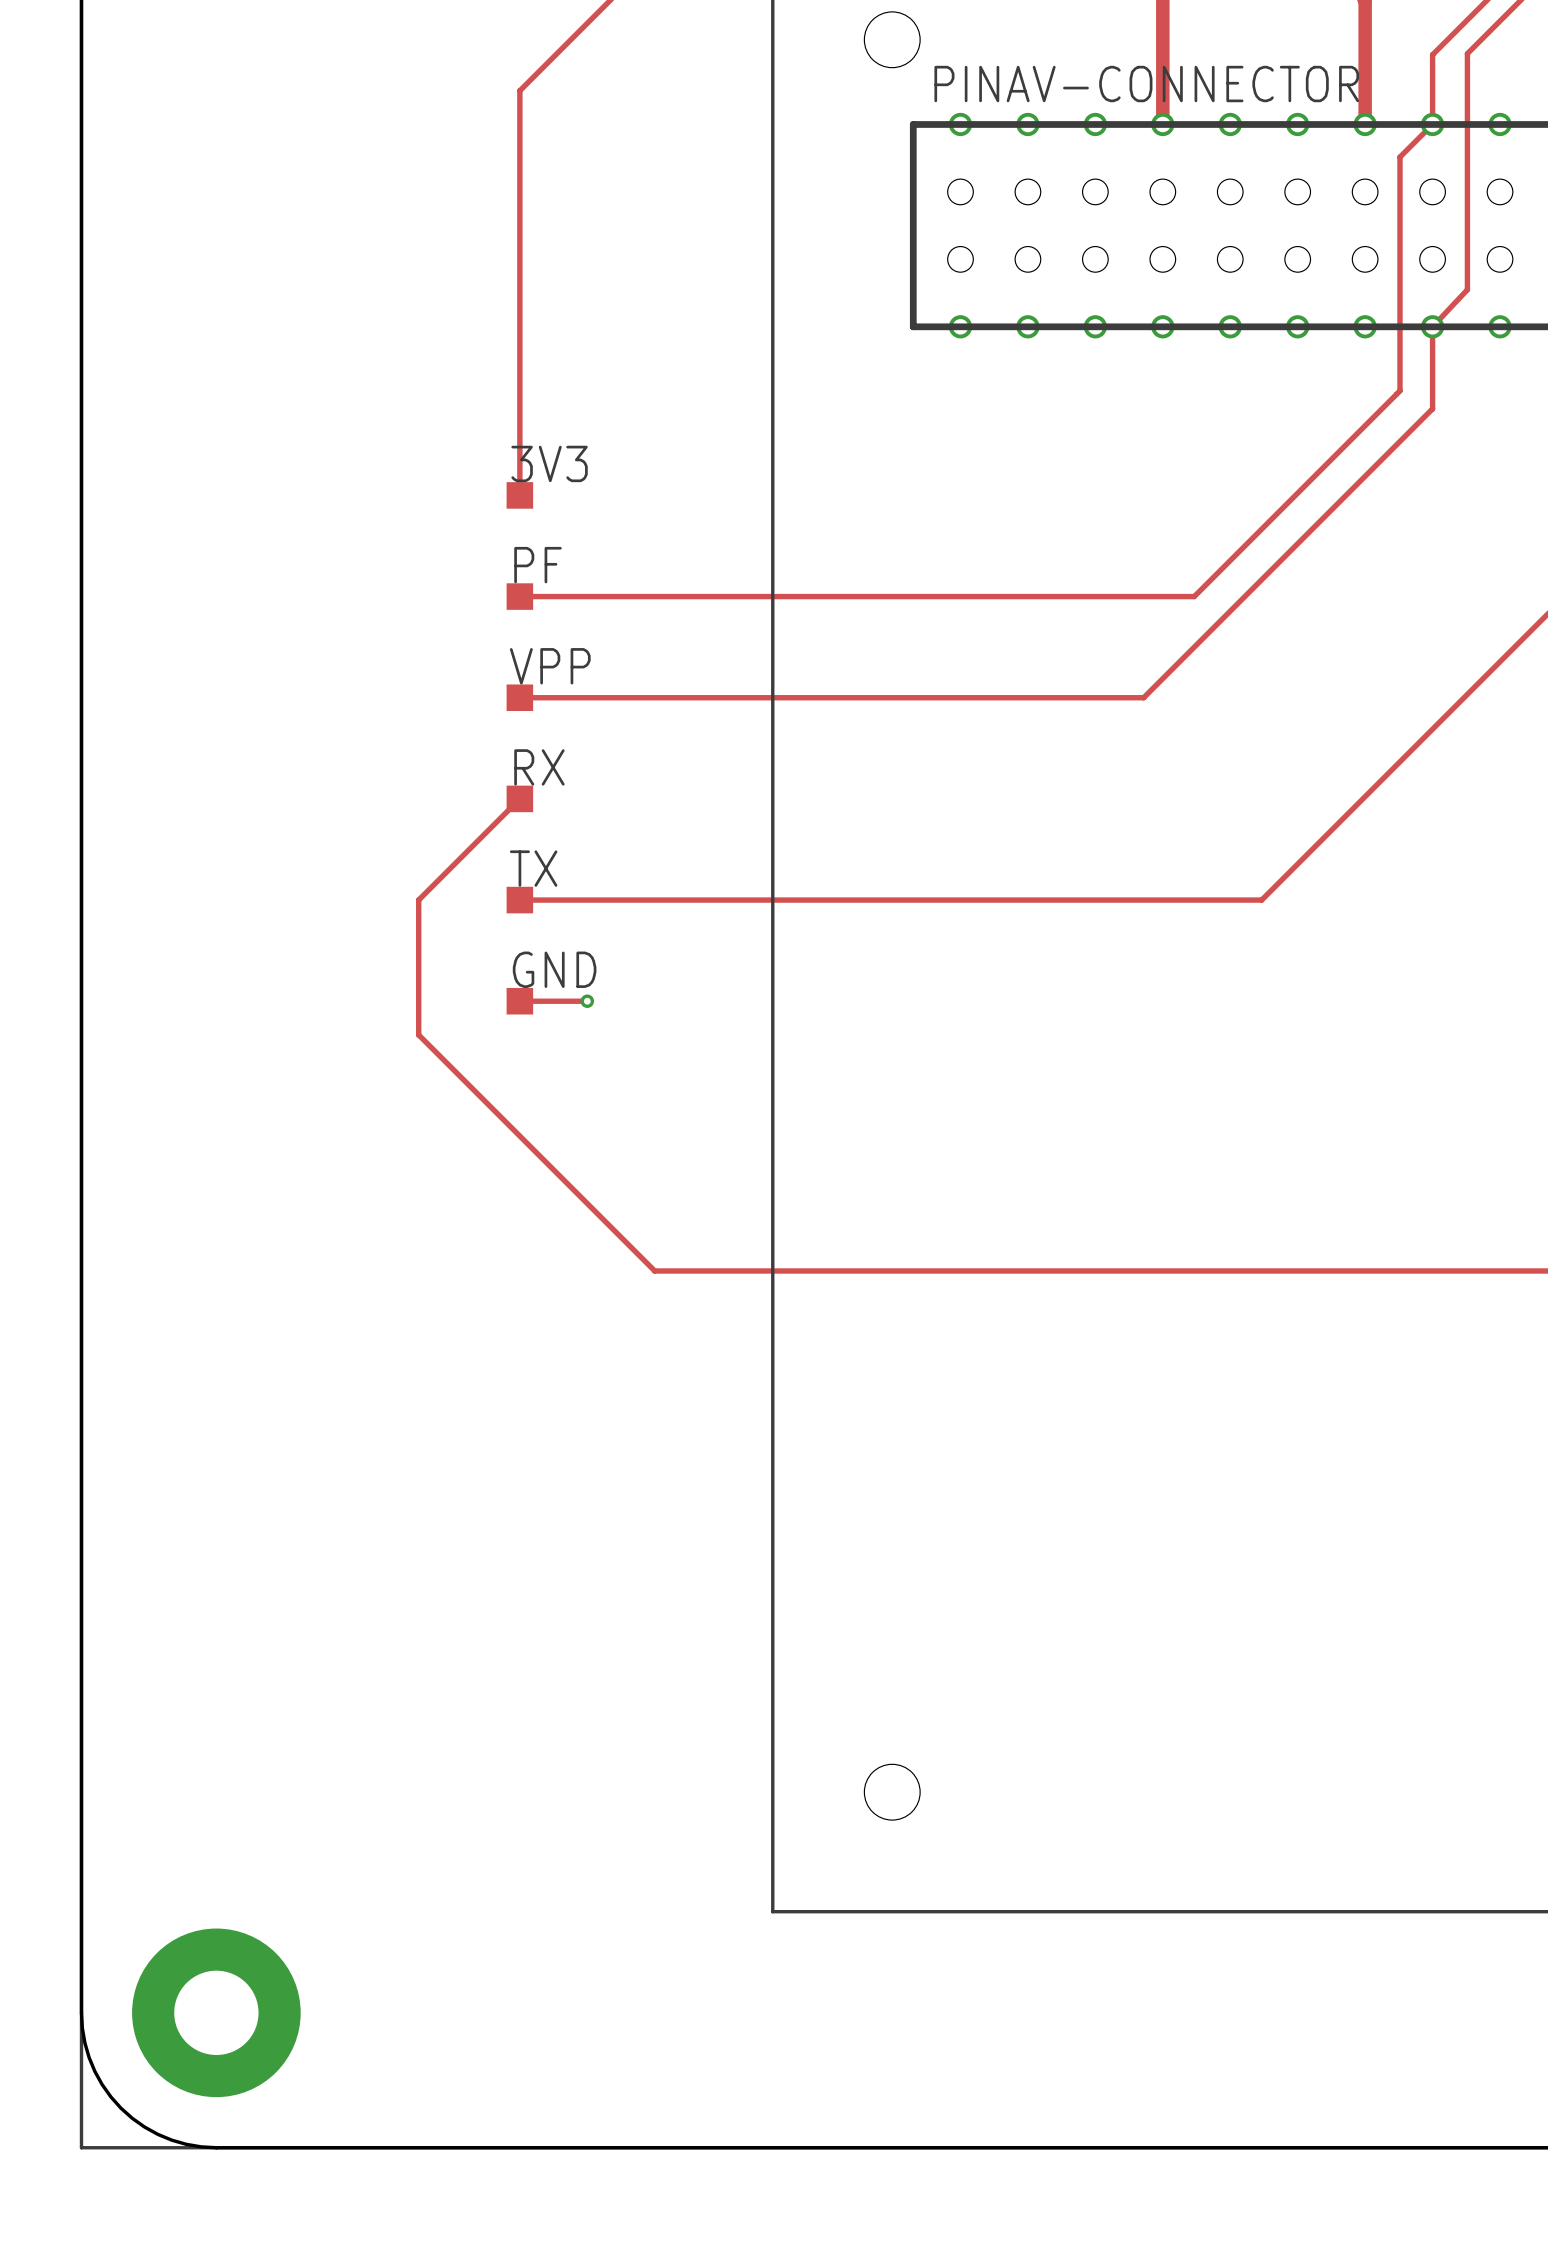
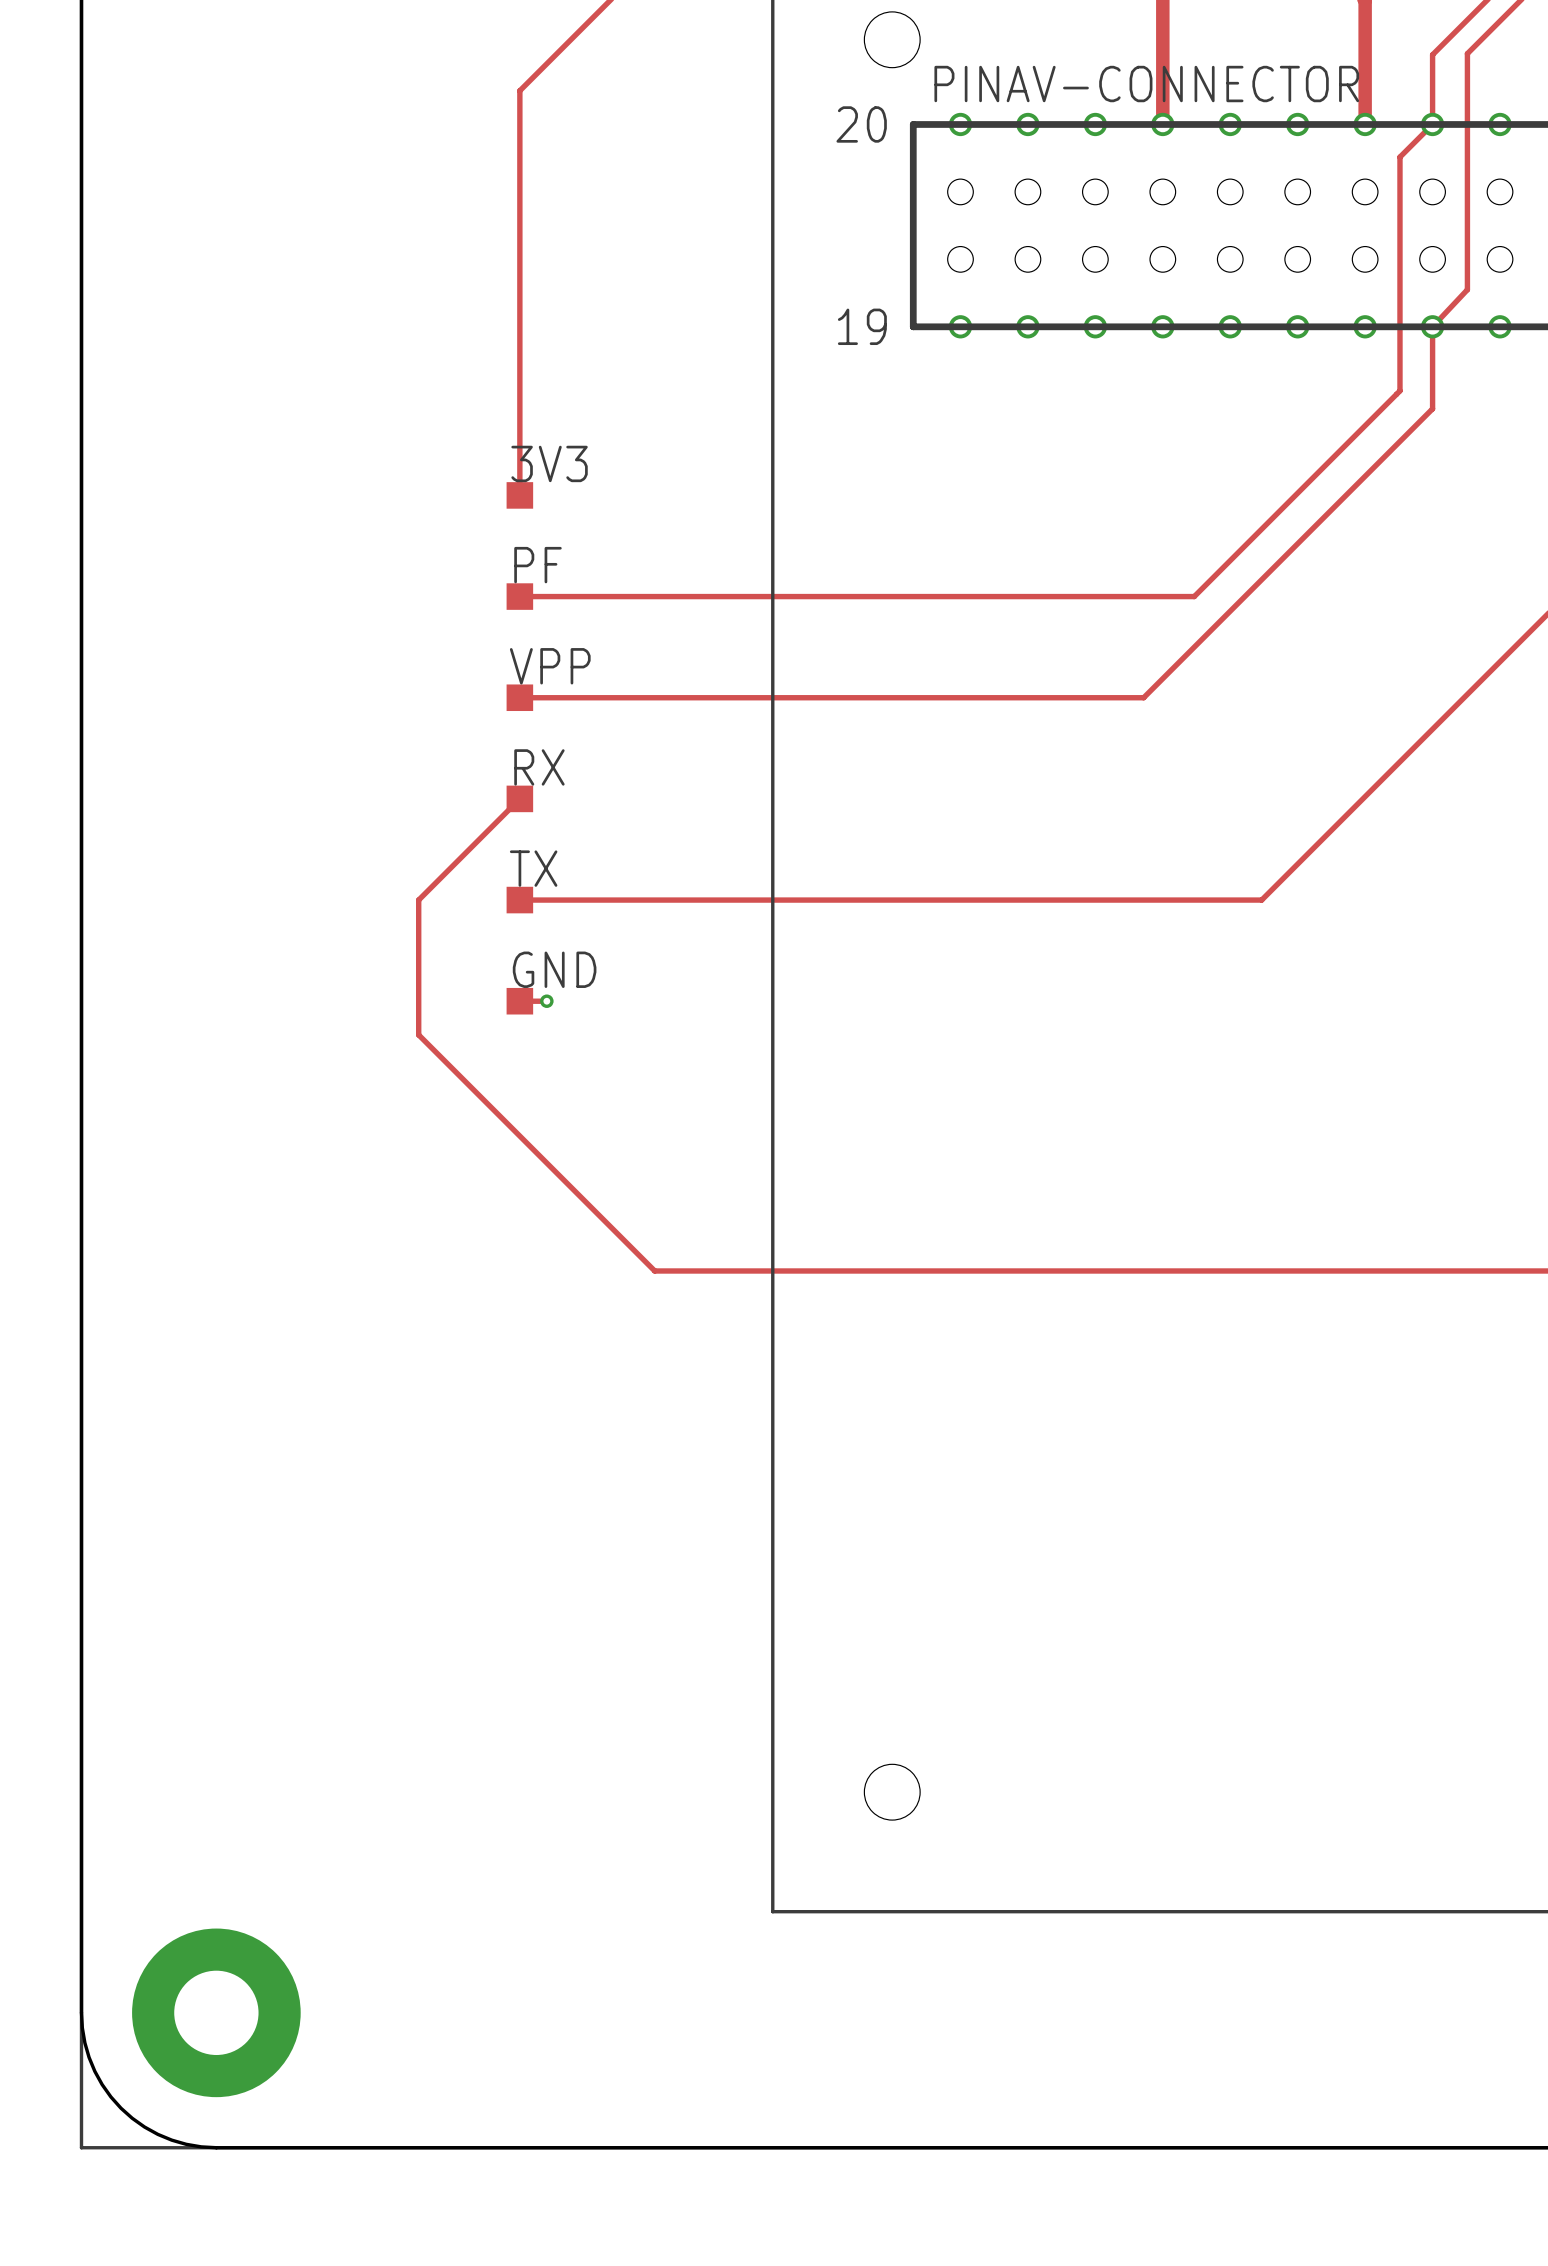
PINAV-CONNECTOR text: none -> 20 (861, 124)
PINAV-CONNECTOR text: none -> 19 (862, 326)
track: (546, 1001) (587, 1001) -> none
via position: (587, 1001) -> (546, 1001)

